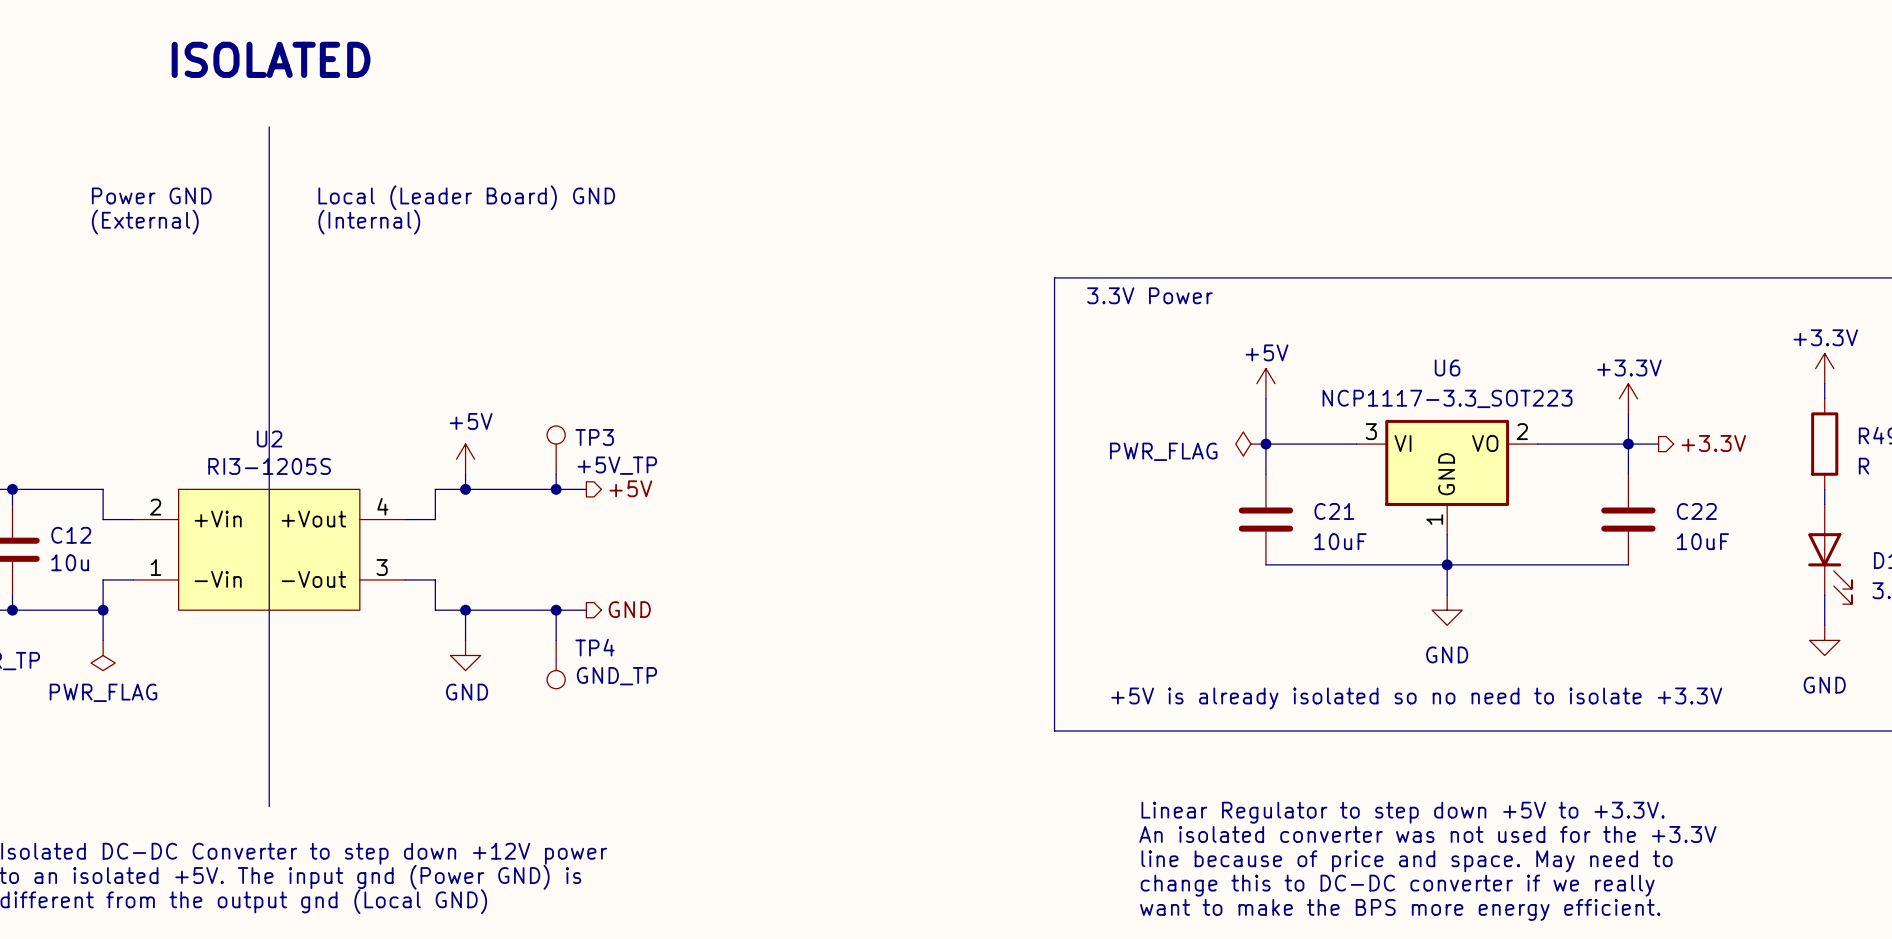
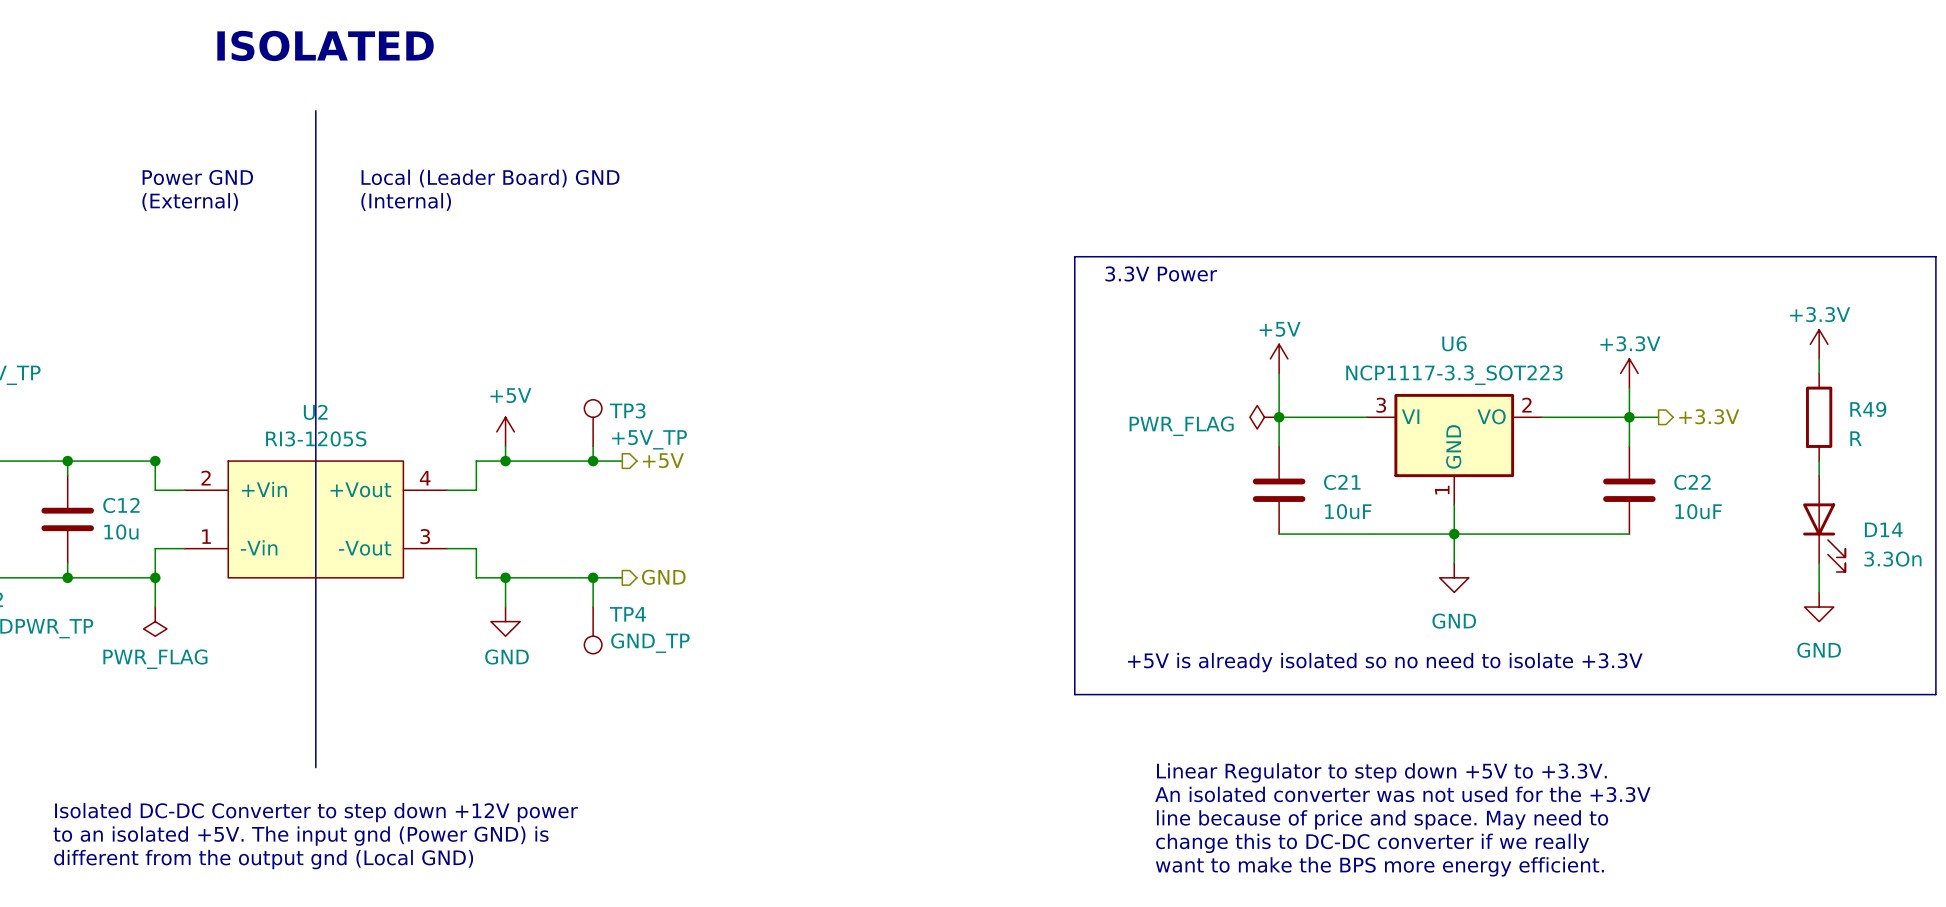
junction: none -> (155, 461)

